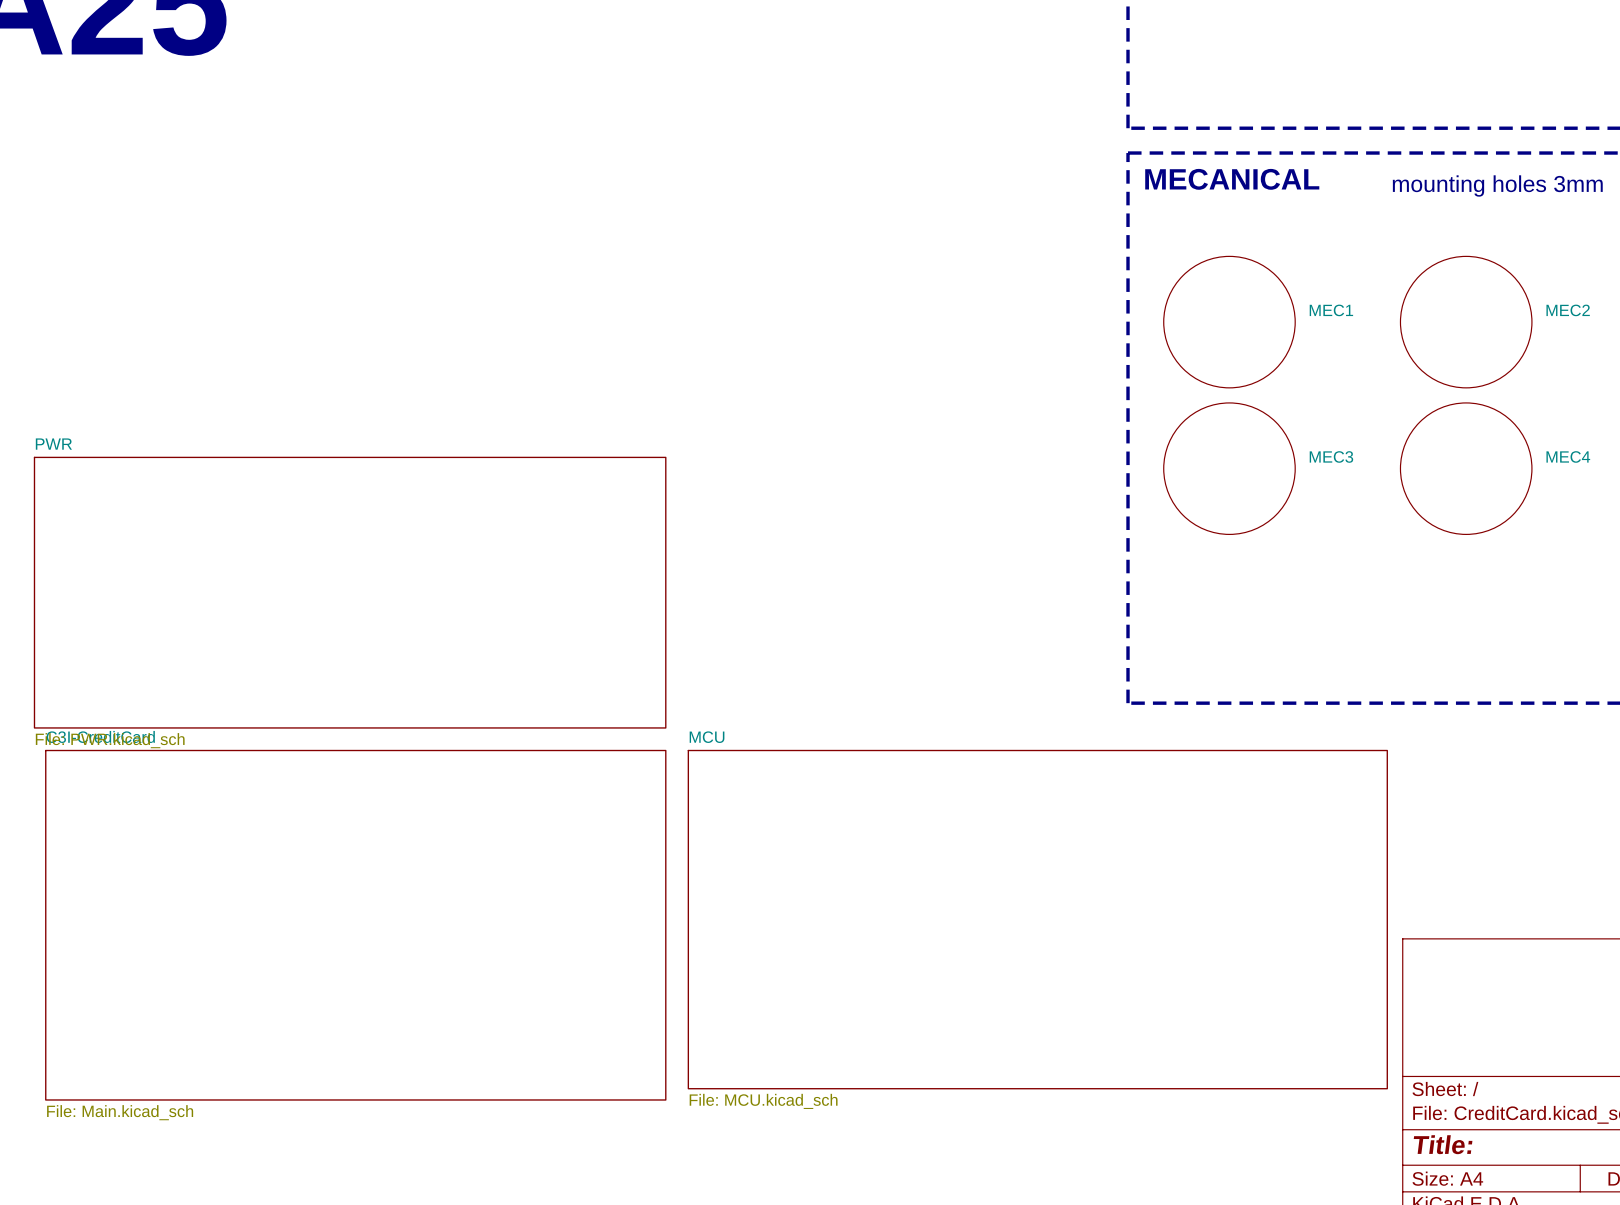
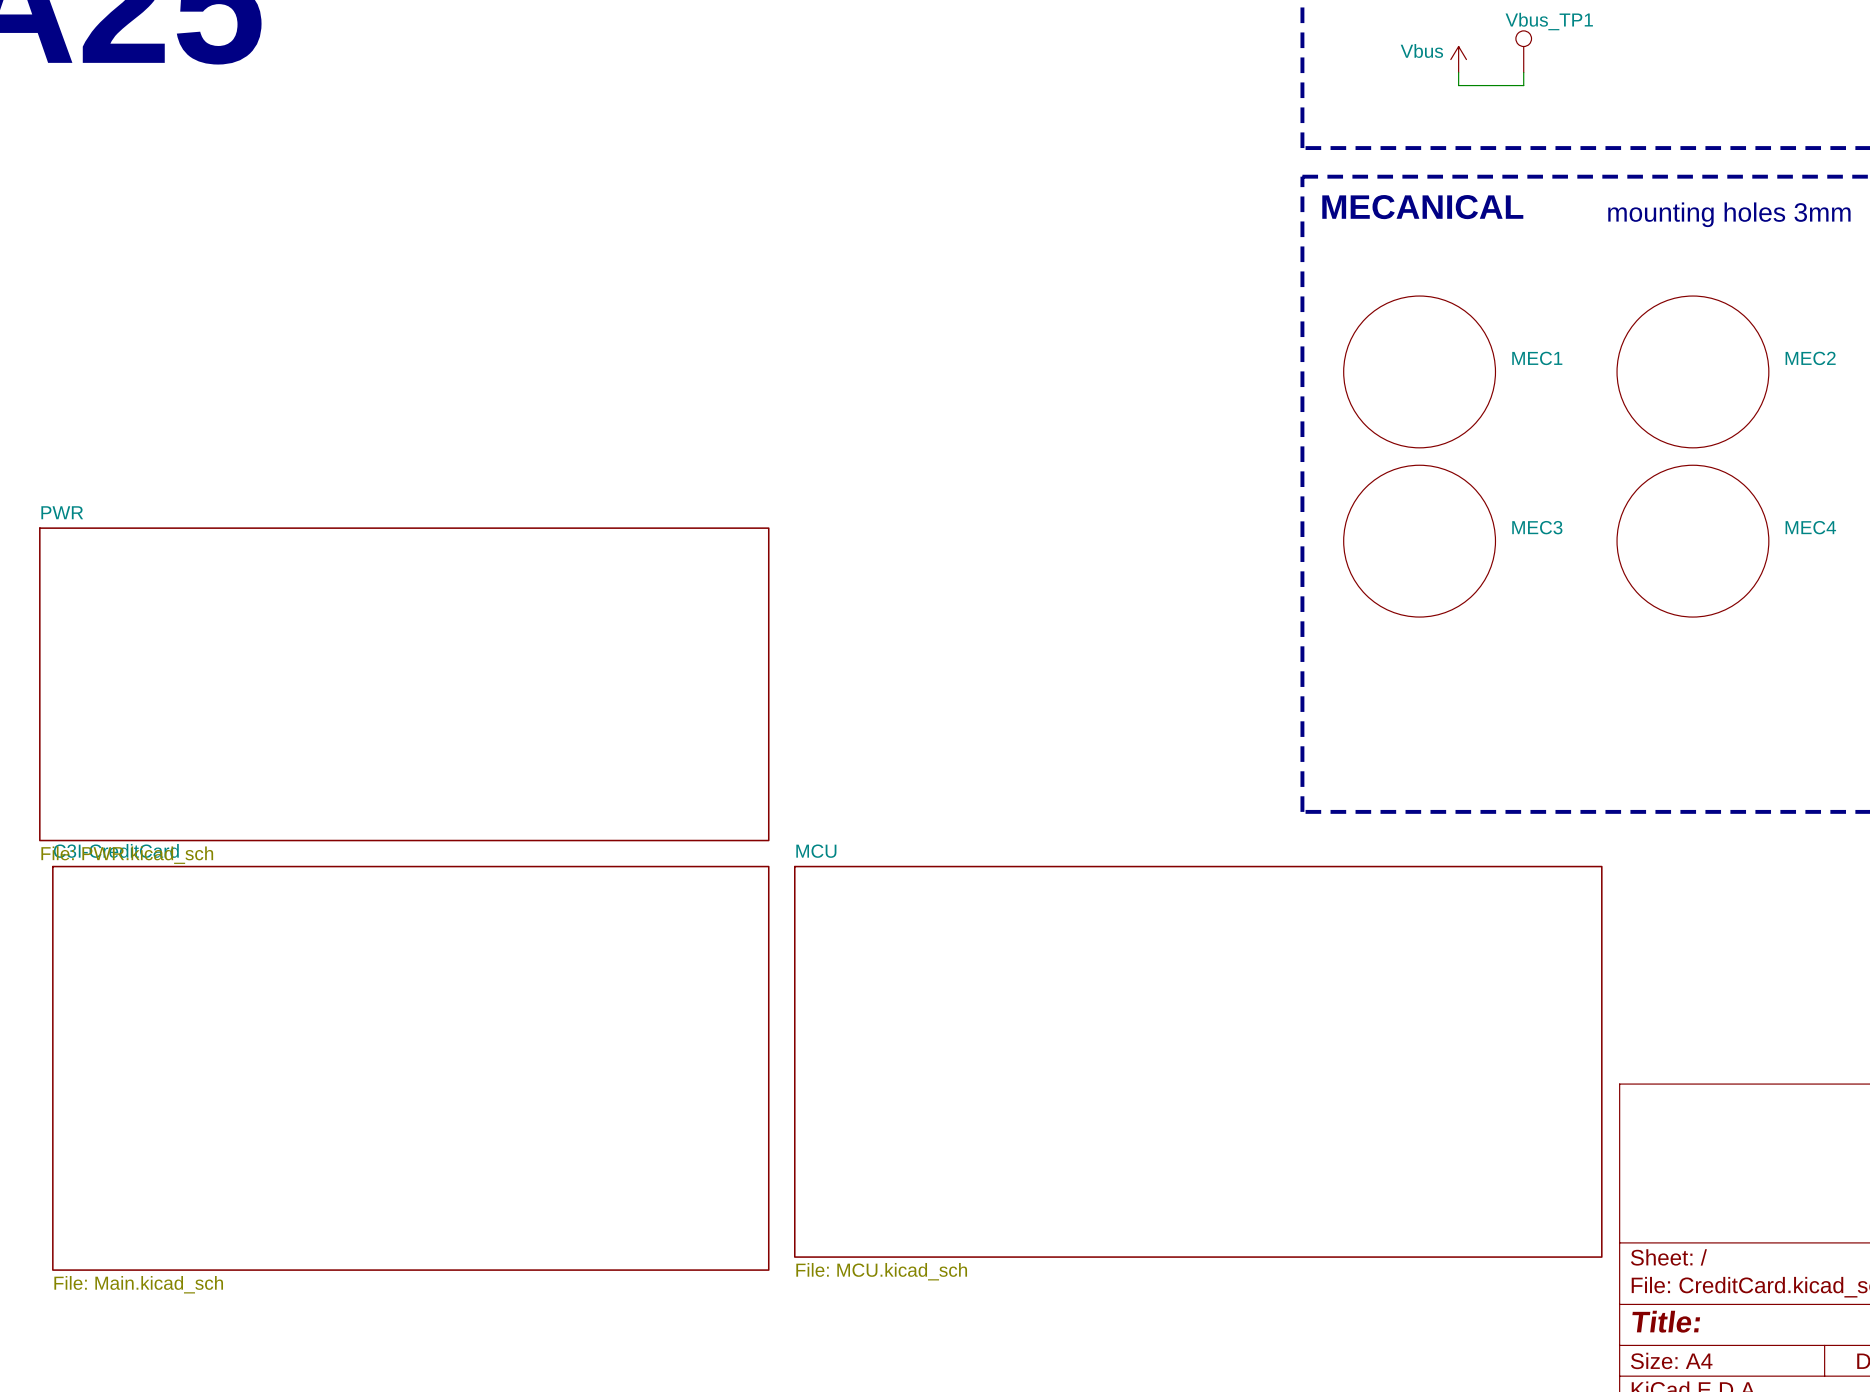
Vbus_TP1: none -> (1523, 51)
power symbol: none -> Vbus (1458, 59)
wire: none -> (1458, 72) (1458, 85) (1523, 85) (1523, 72)

